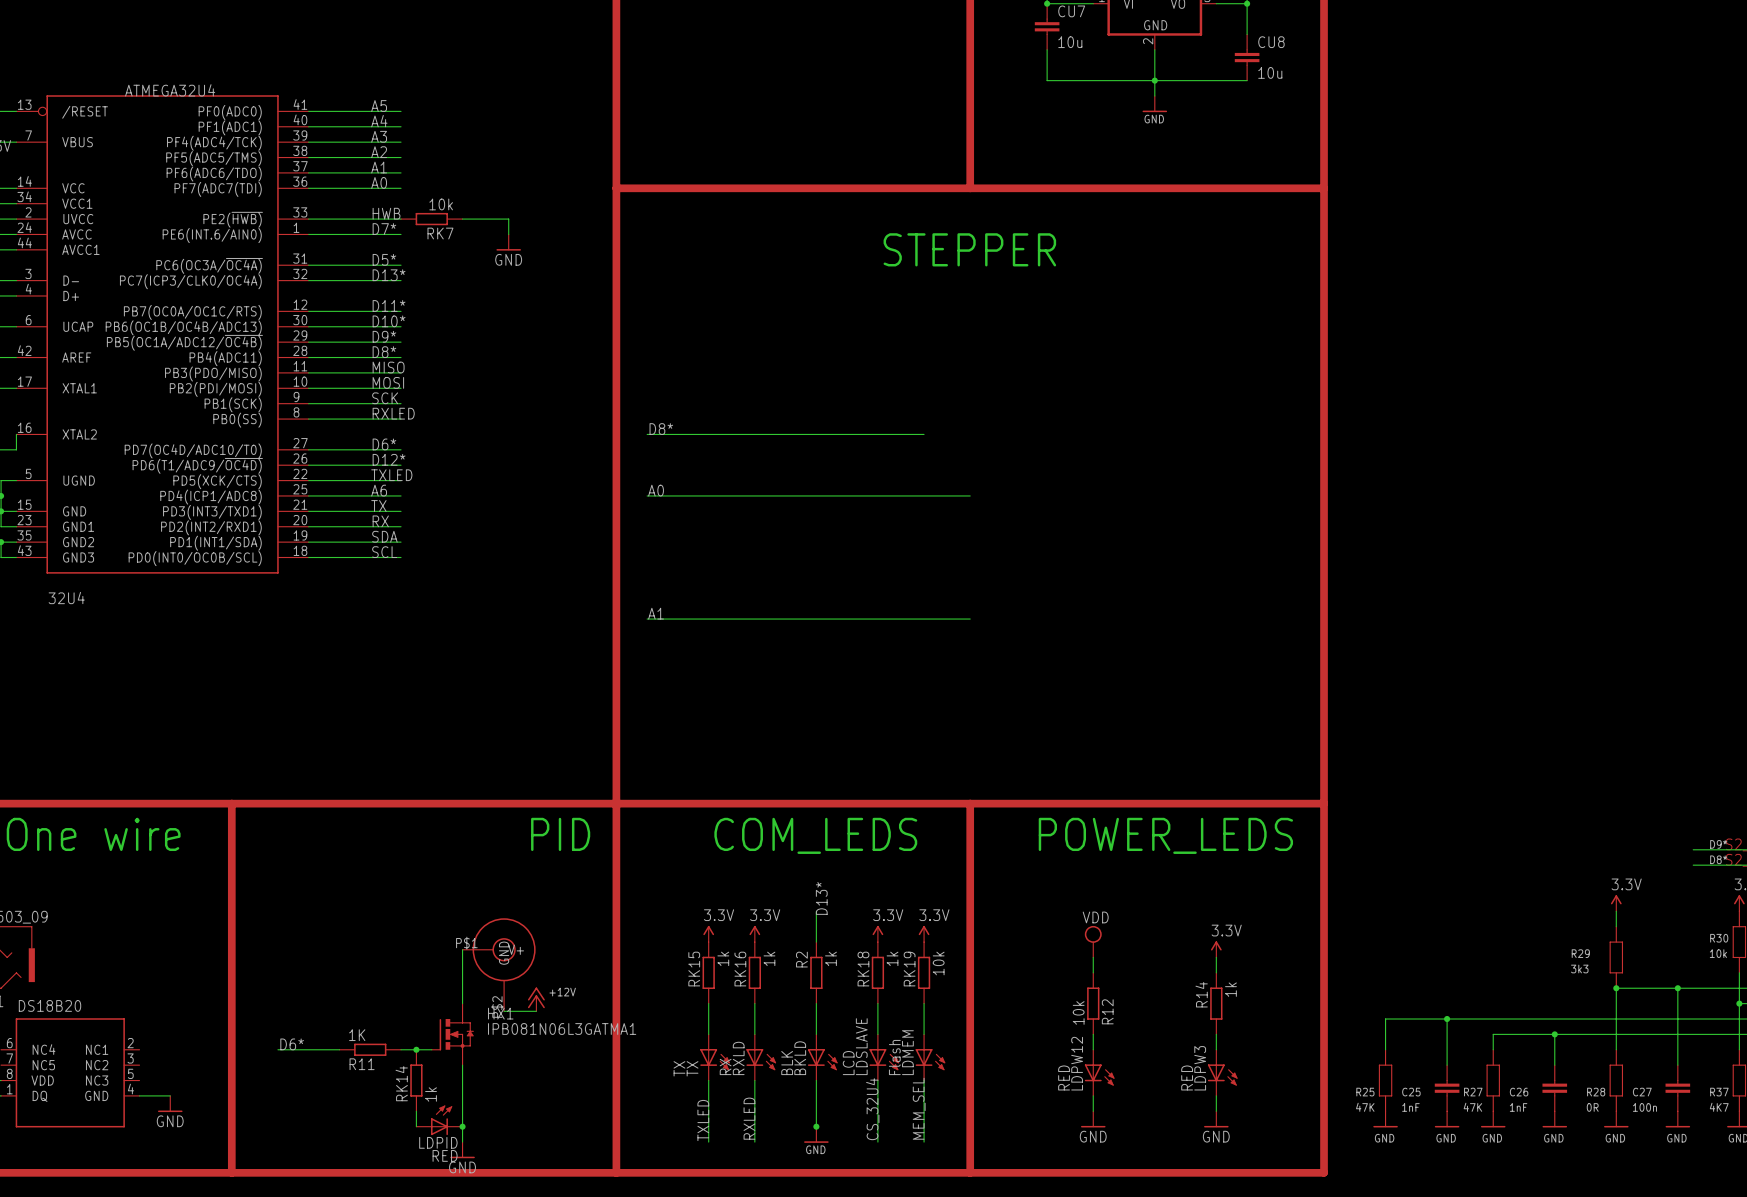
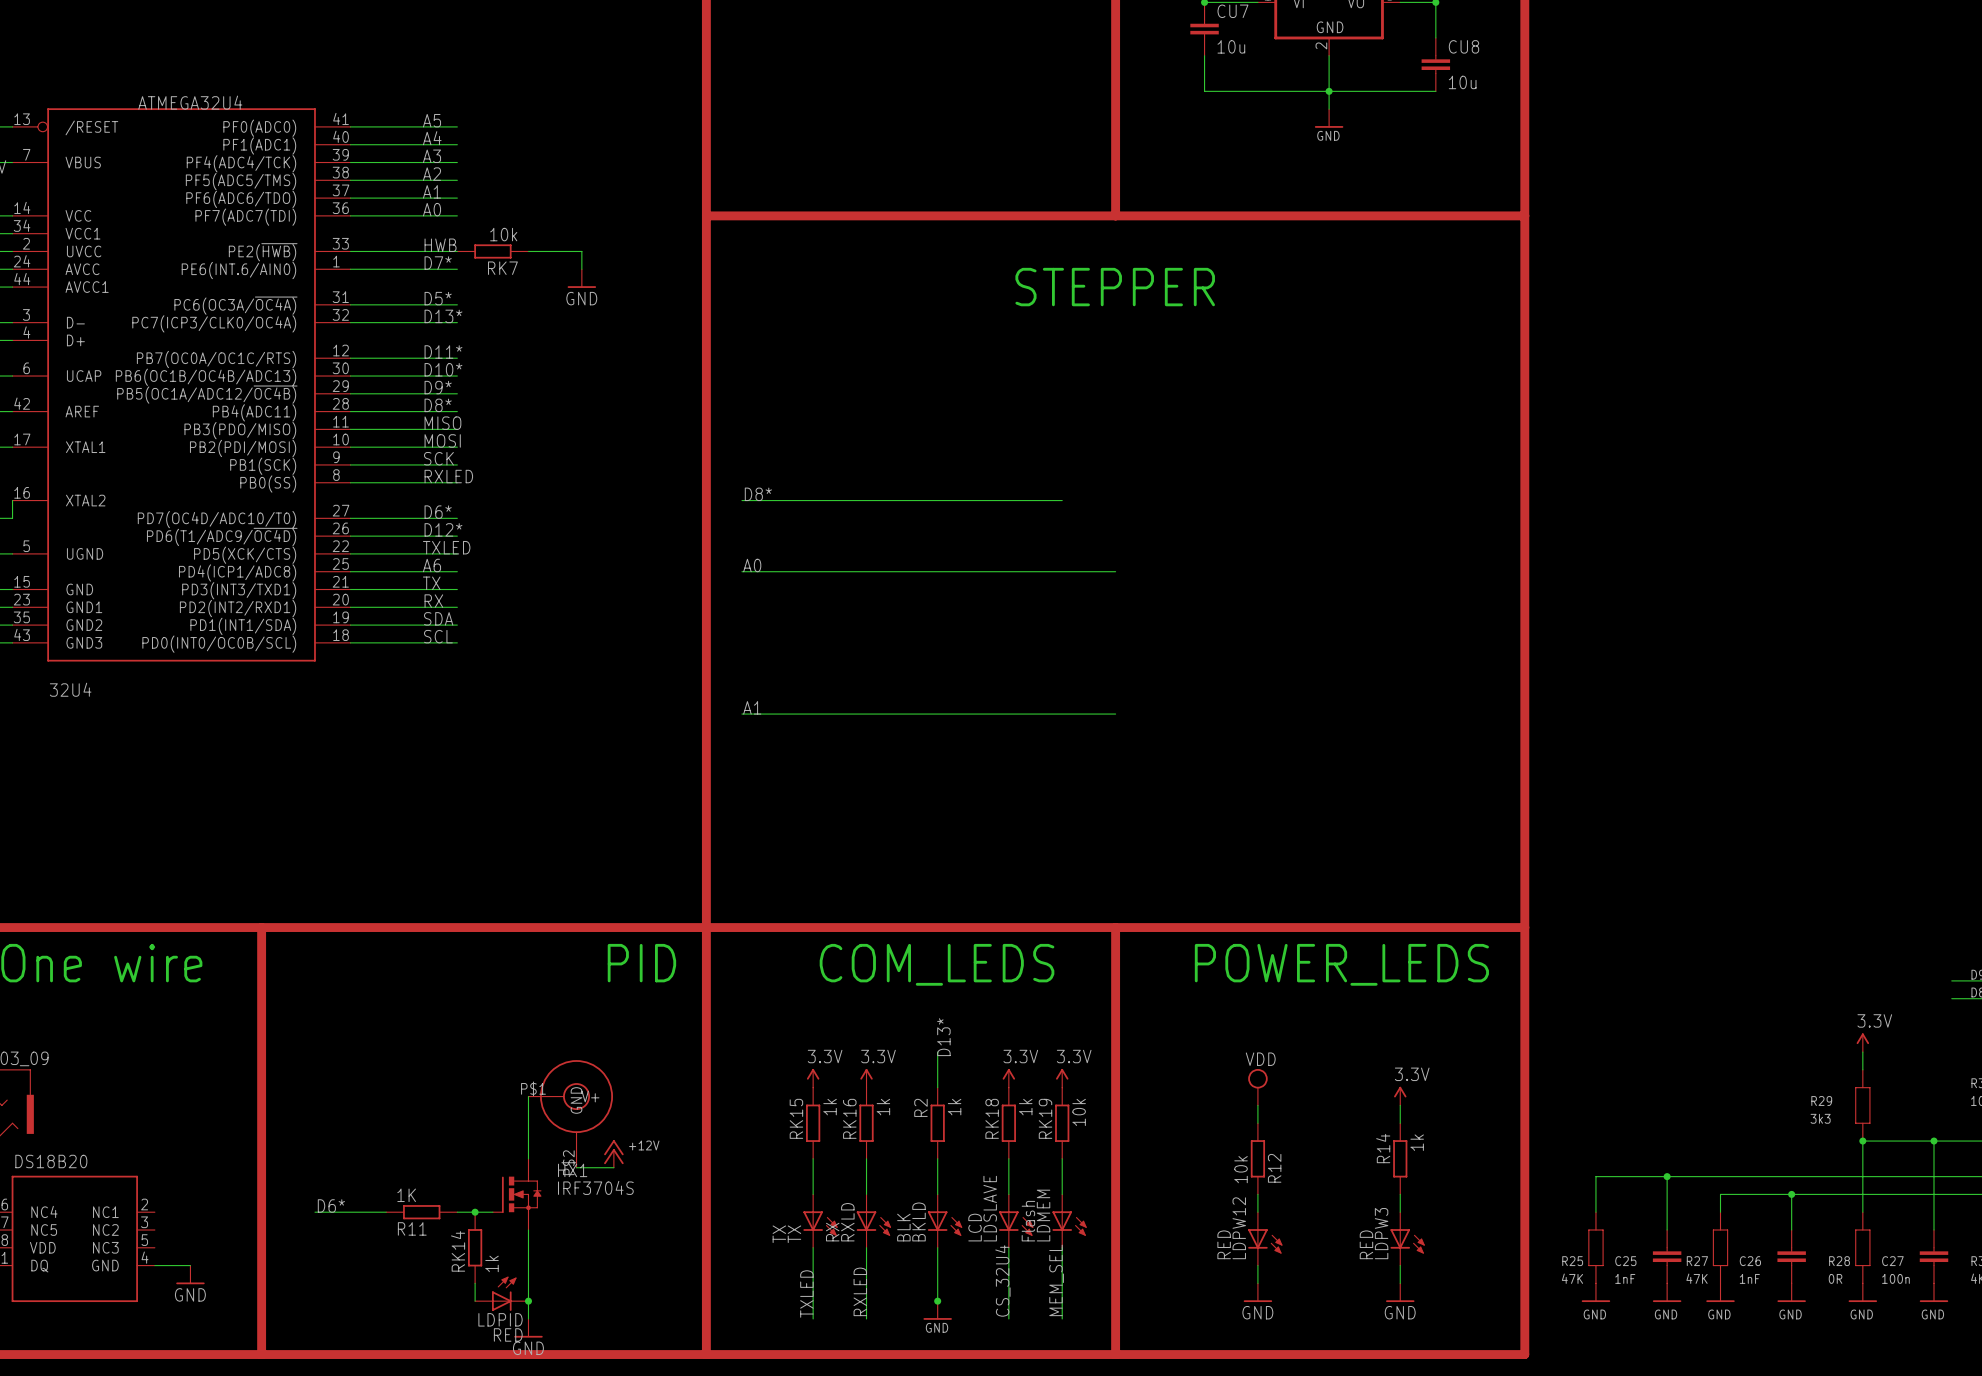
HX1 value: IPB081N06L3GATMA1 (562, 1029) -> IRF3704S (595, 1187)

